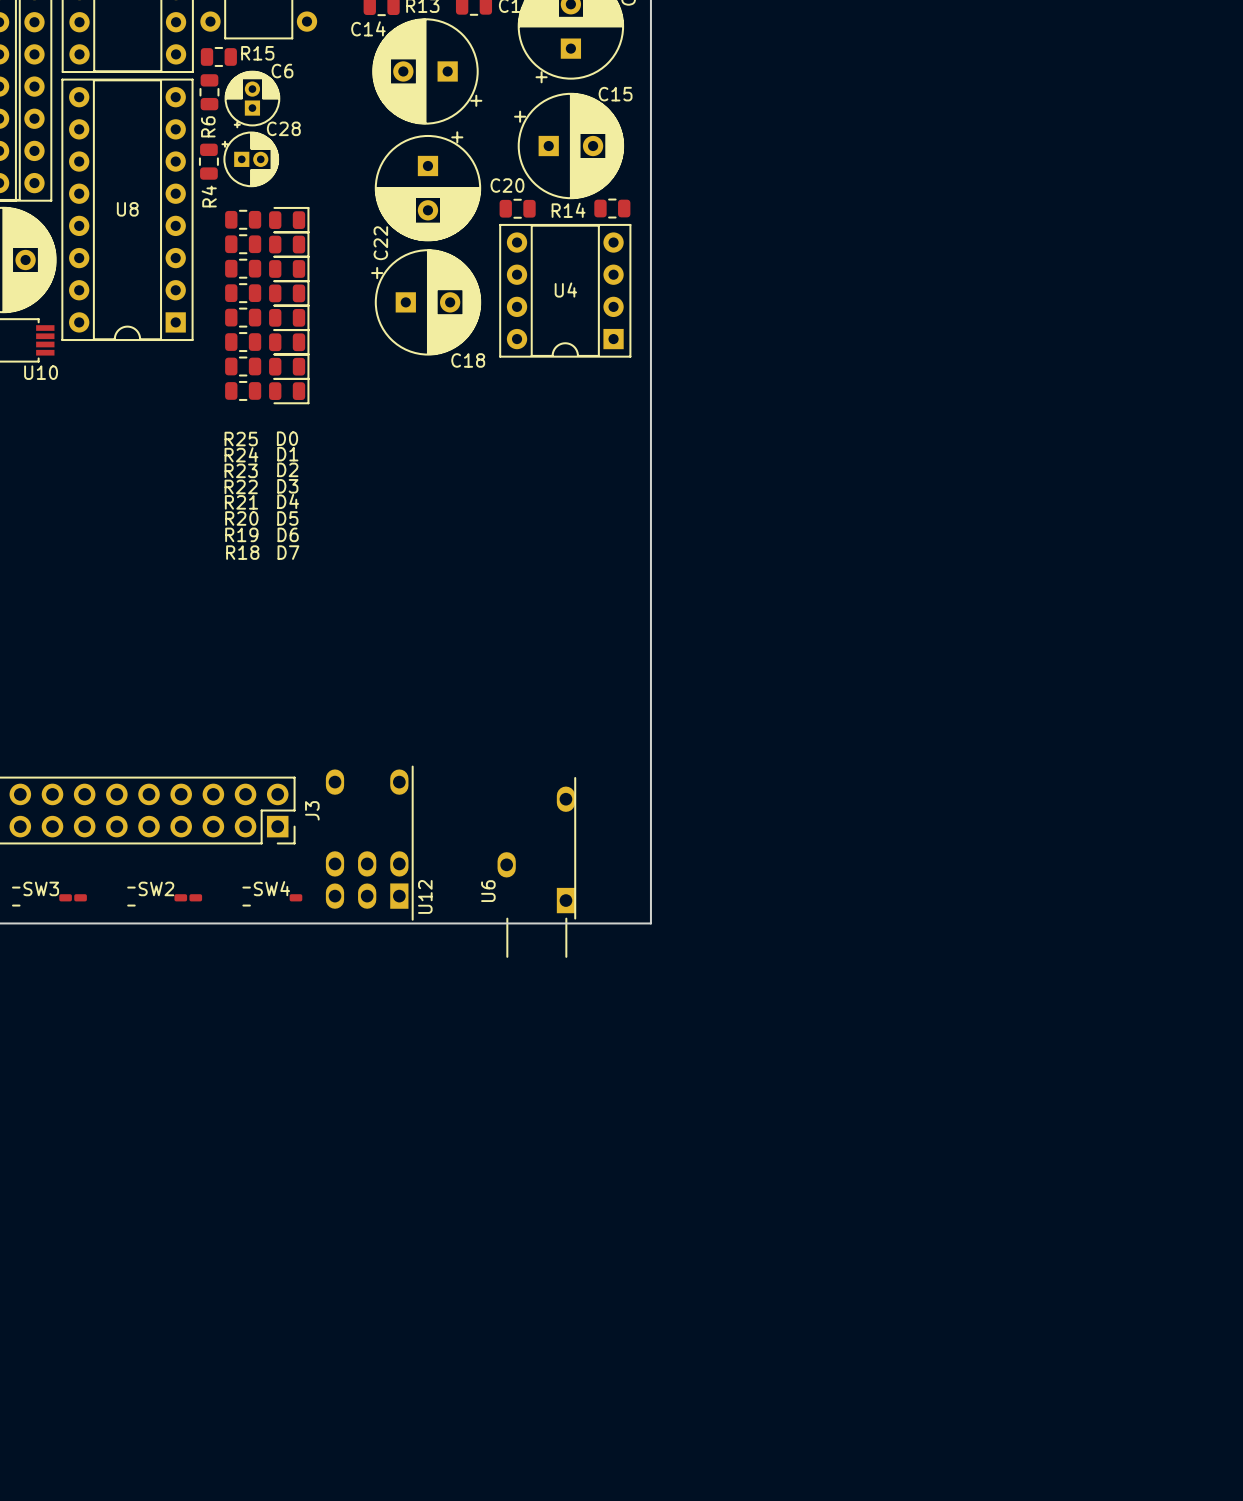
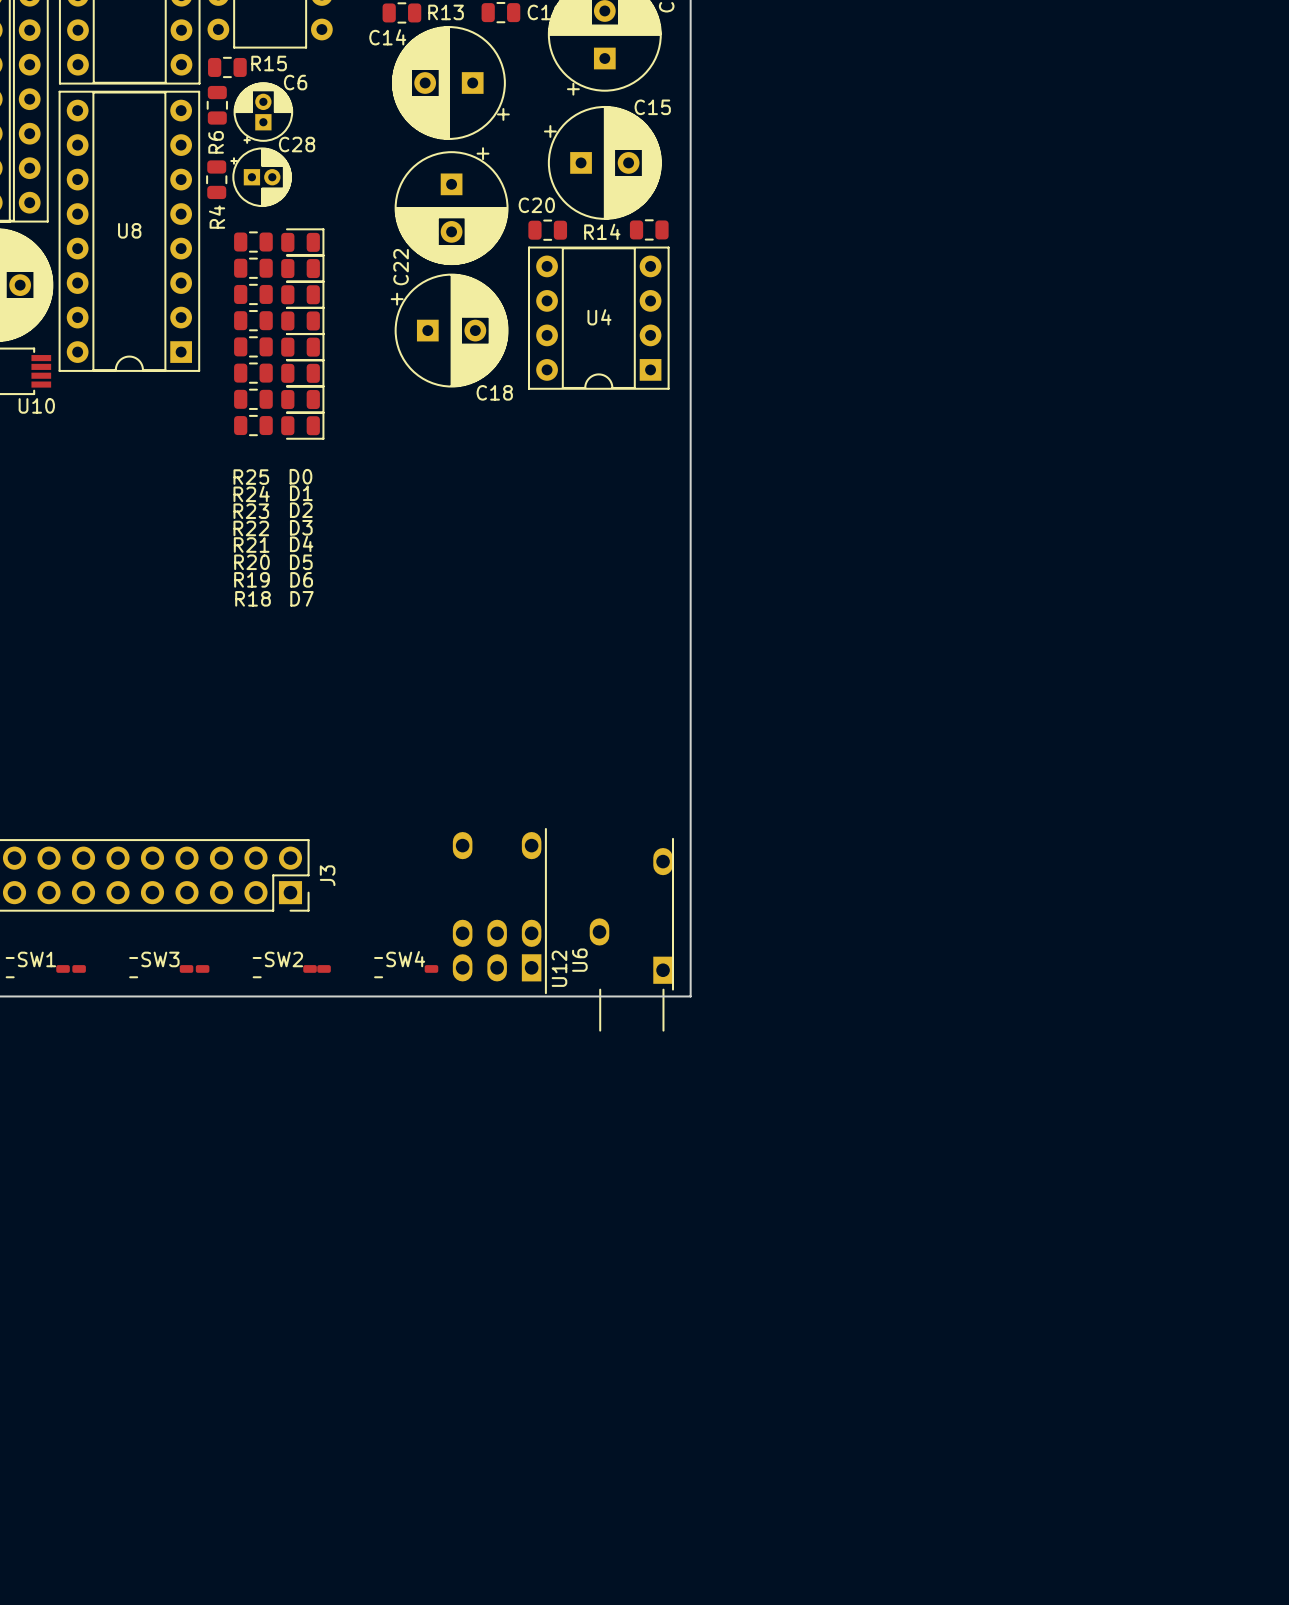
U12 position: (369, 843) -> (499, 911)
U6 position: (536, 867) -> (631, 934)
SW3 name: SW3 (41, 888) -> SW1 (36, 959)
SW2 name: SW2 (156, 888) -> SW3 (160, 959)
SW4 name: SW4 (271, 888) -> SW2 (283, 959)
SW4: none -> (377, 967)

